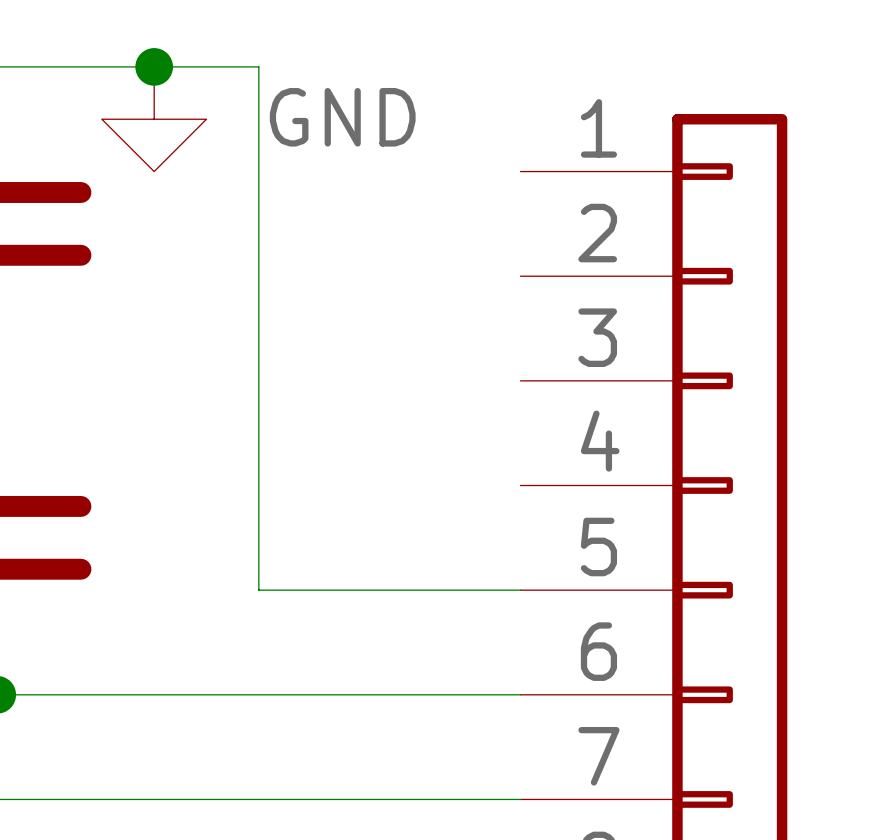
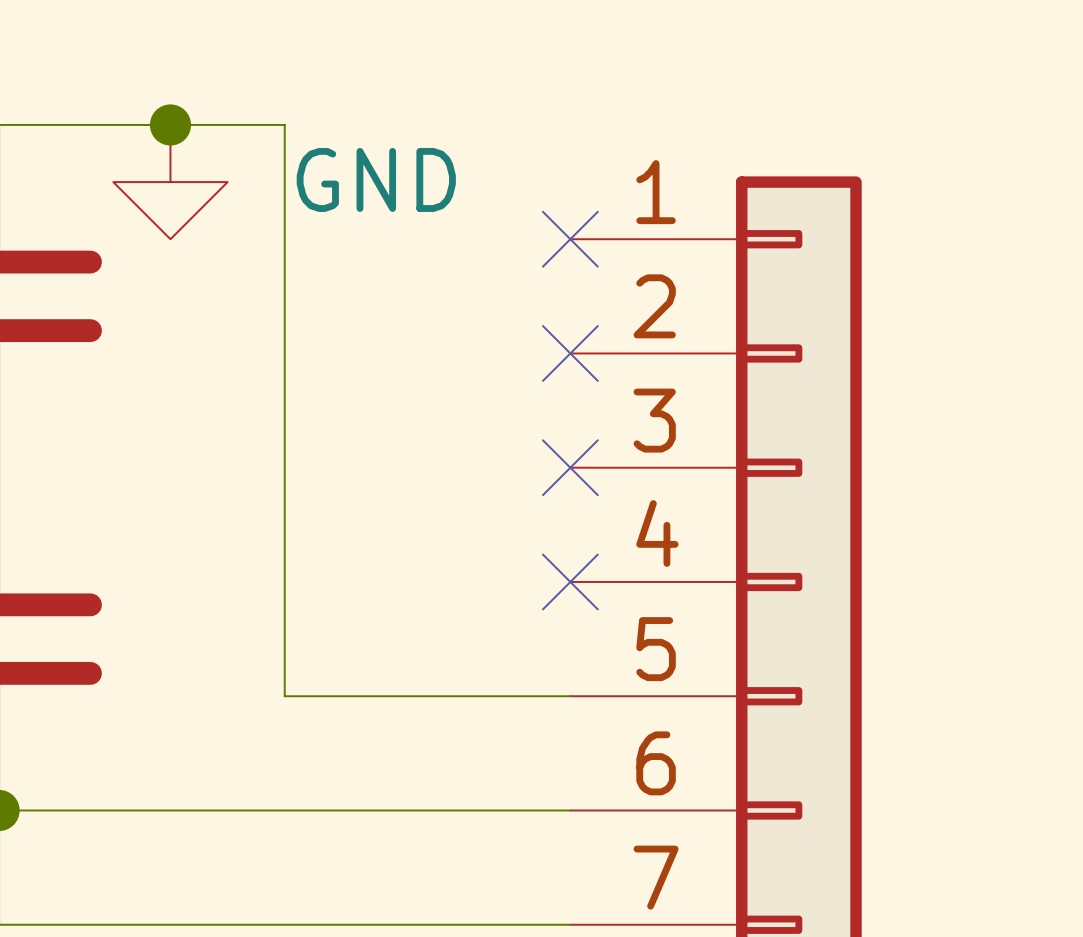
no-connect mark: none -> (570, 239)
no-connect mark: none -> (570, 353)
no-connect mark: none -> (570, 467)
no-connect mark: none -> (570, 581)

